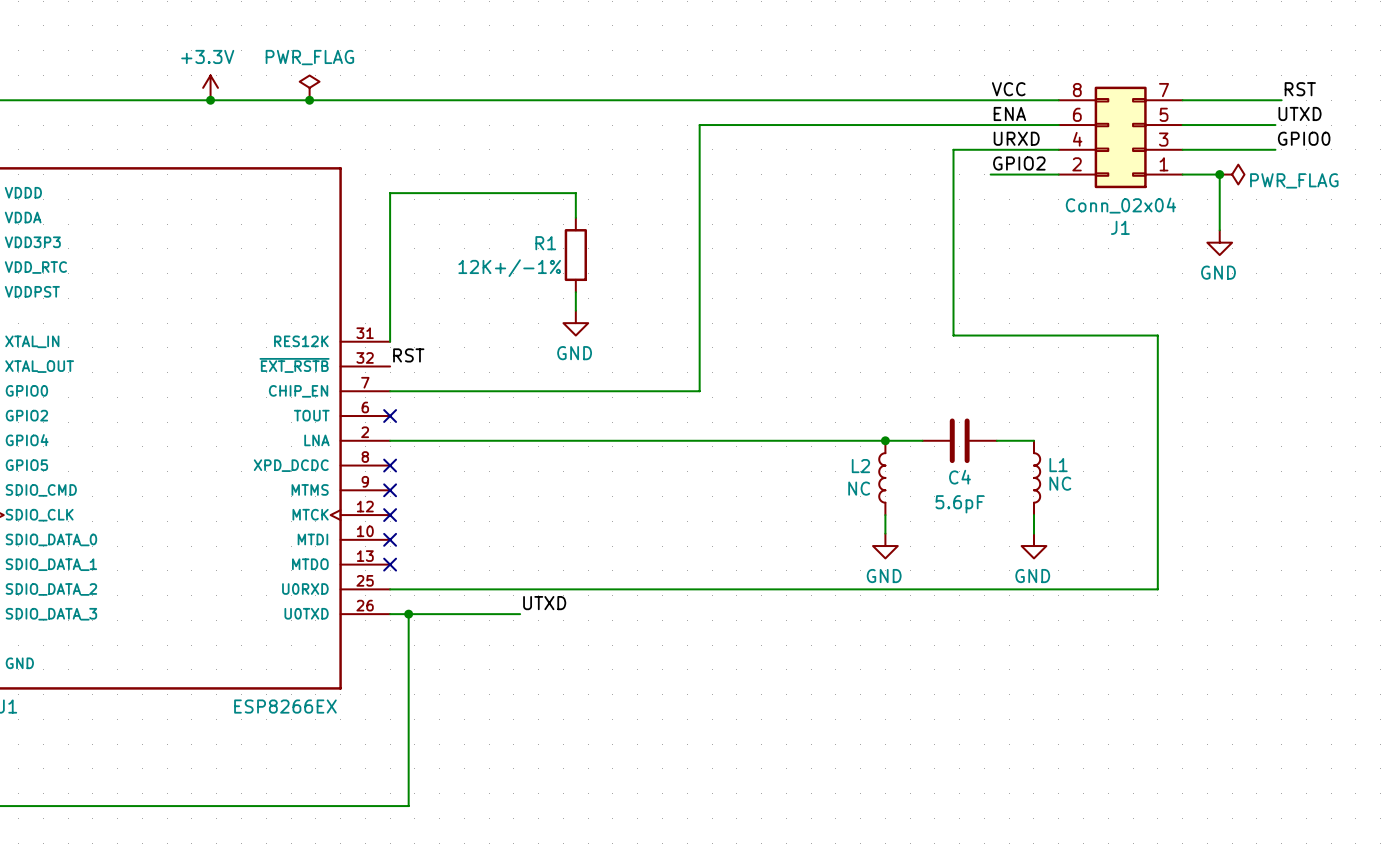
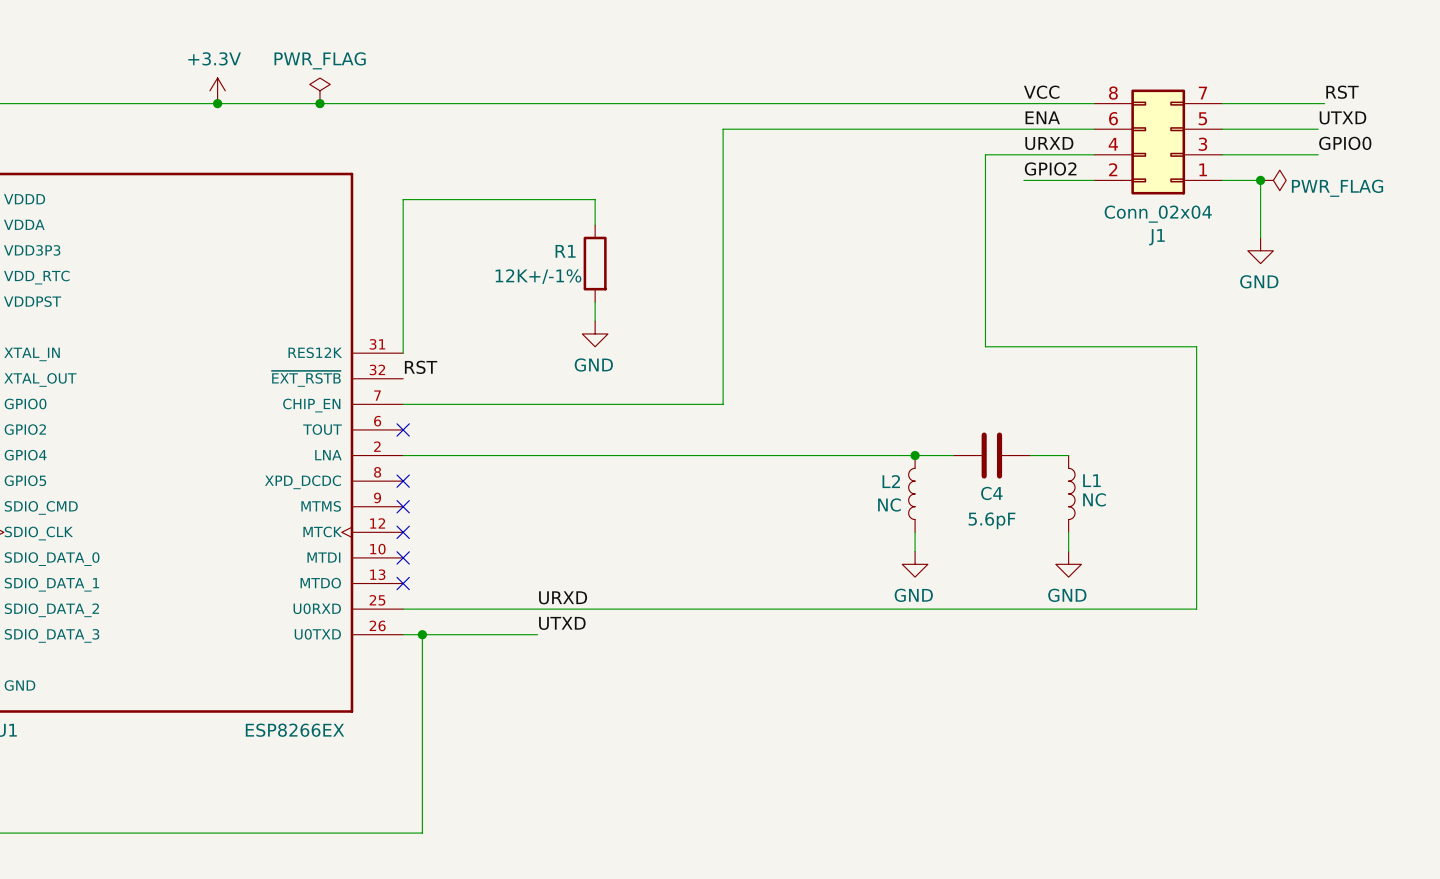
label: none -> URXD (563, 597)

